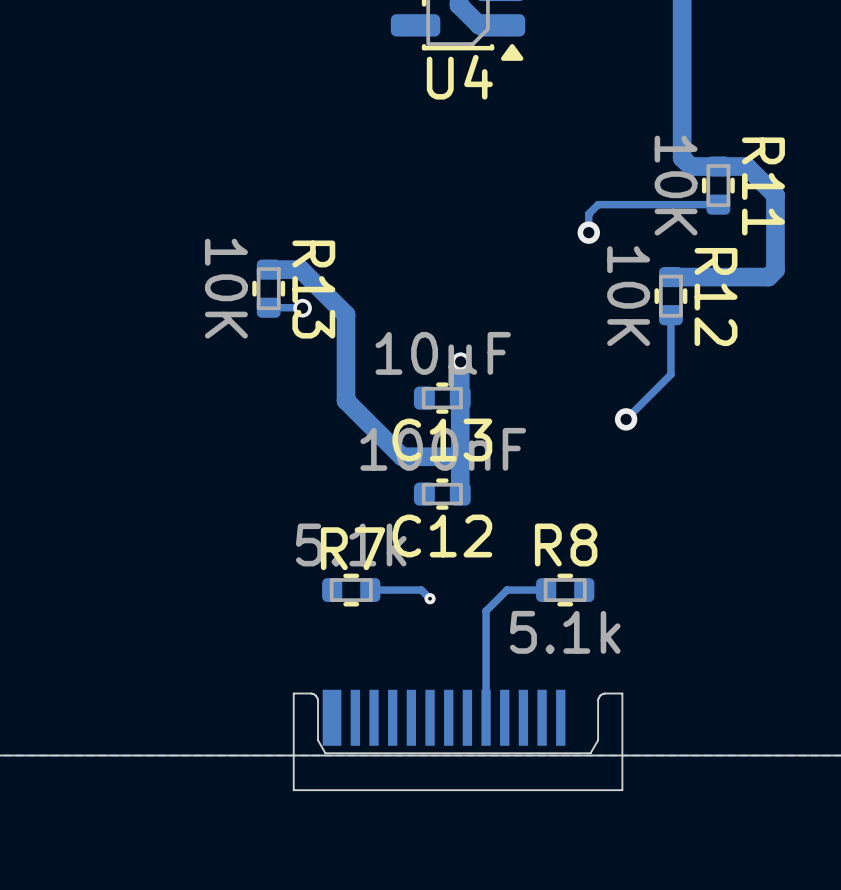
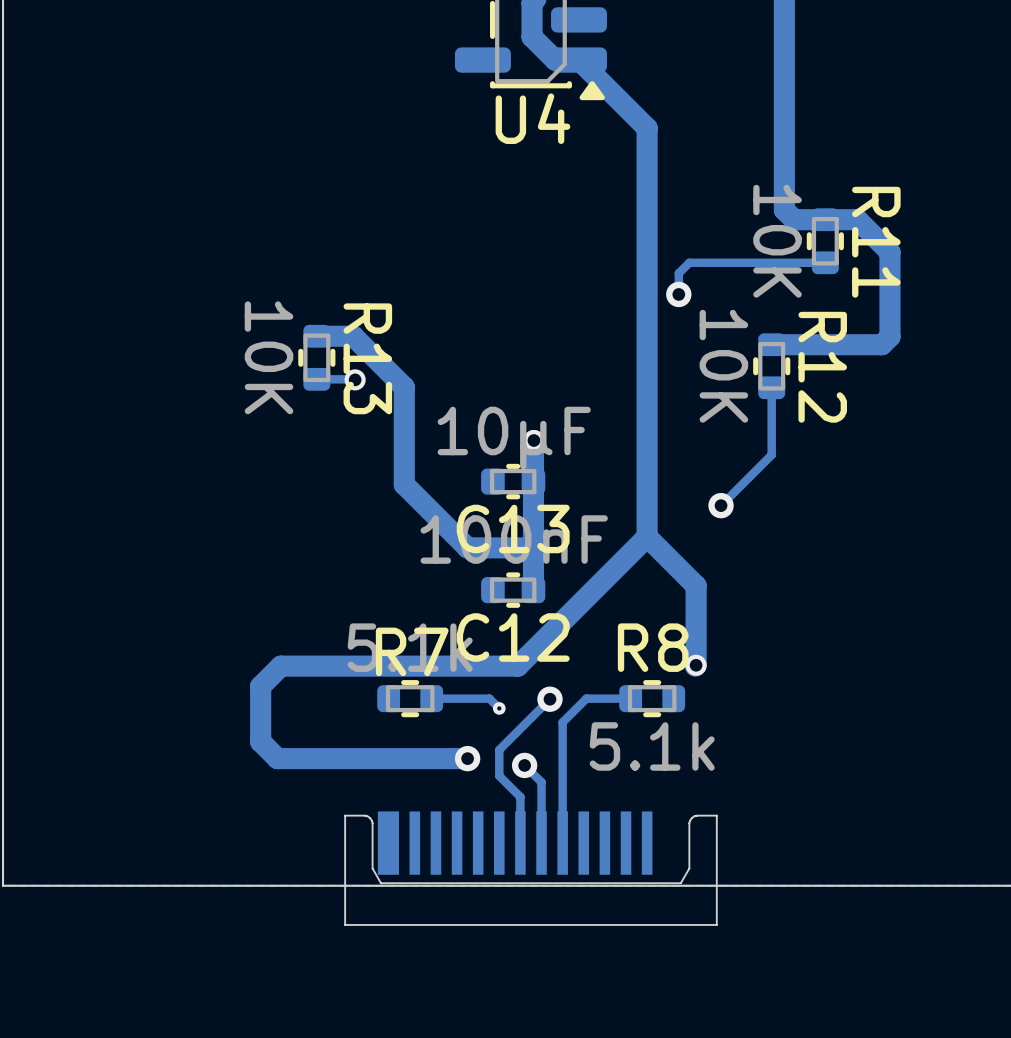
track: none -> (579, 60) (647, 128) (647, 536)
track: none -> (647, 536) (517, 666) (280, 666) (260, 686) (260, 741) (277, 758) (467, 758)
track: none -> (647, 536) (696, 585) (695, 666)
via: none -> (696, 665)
track: none -> (549, 699) (499, 749) (499, 775) (520, 797) (520, 843)
via: none -> (549, 699)
via: none -> (467, 758)
track: none -> (524, 765) (541, 782) (541, 843)
via: none -> (524, 765)

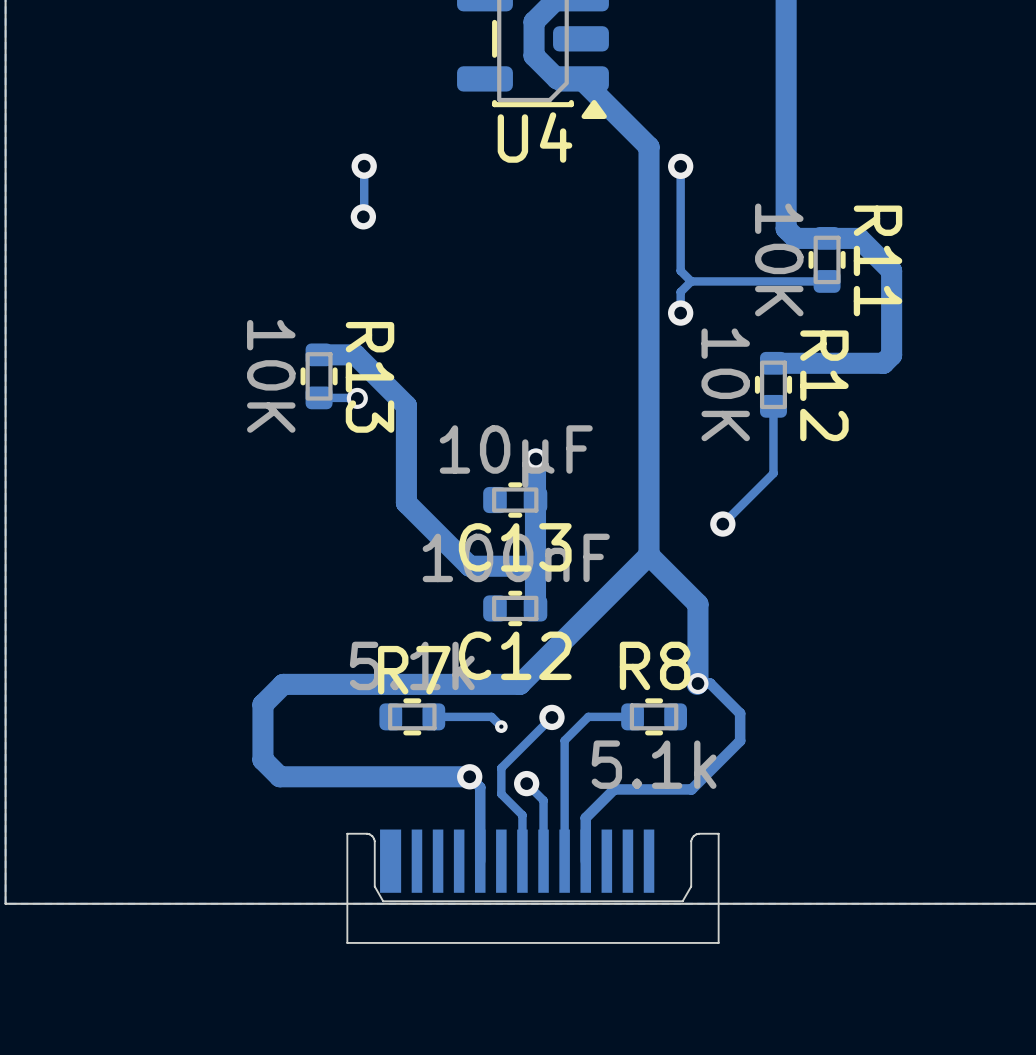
track: none -> (364, 166) (363, 216)
via: none -> (364, 166)
track: none -> (680, 166) (680, 270) (691, 281)
via: none -> (680, 166)
via: none -> (363, 216)
track: none -> (697, 683) (710, 683) (740, 713) (740, 740) (691, 789) (614, 789) (585, 817) (585, 861)
track: none -> (469, 776) (480, 787) (480, 861)

